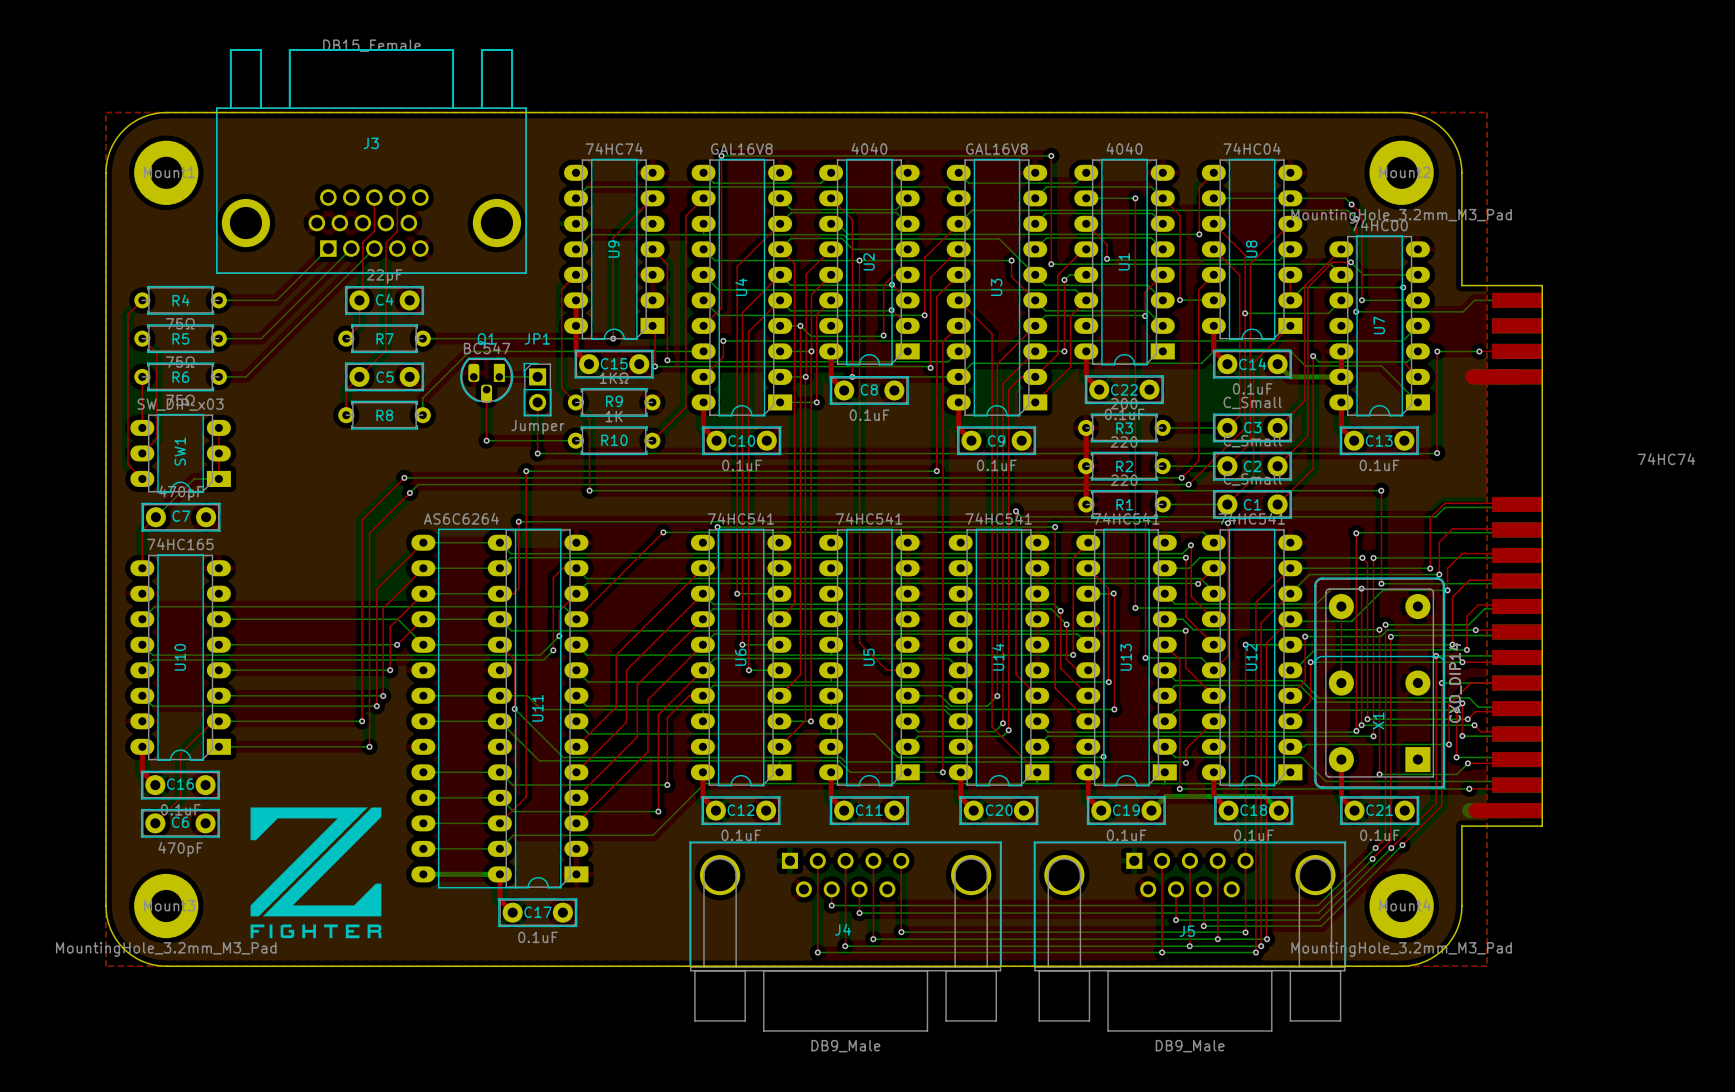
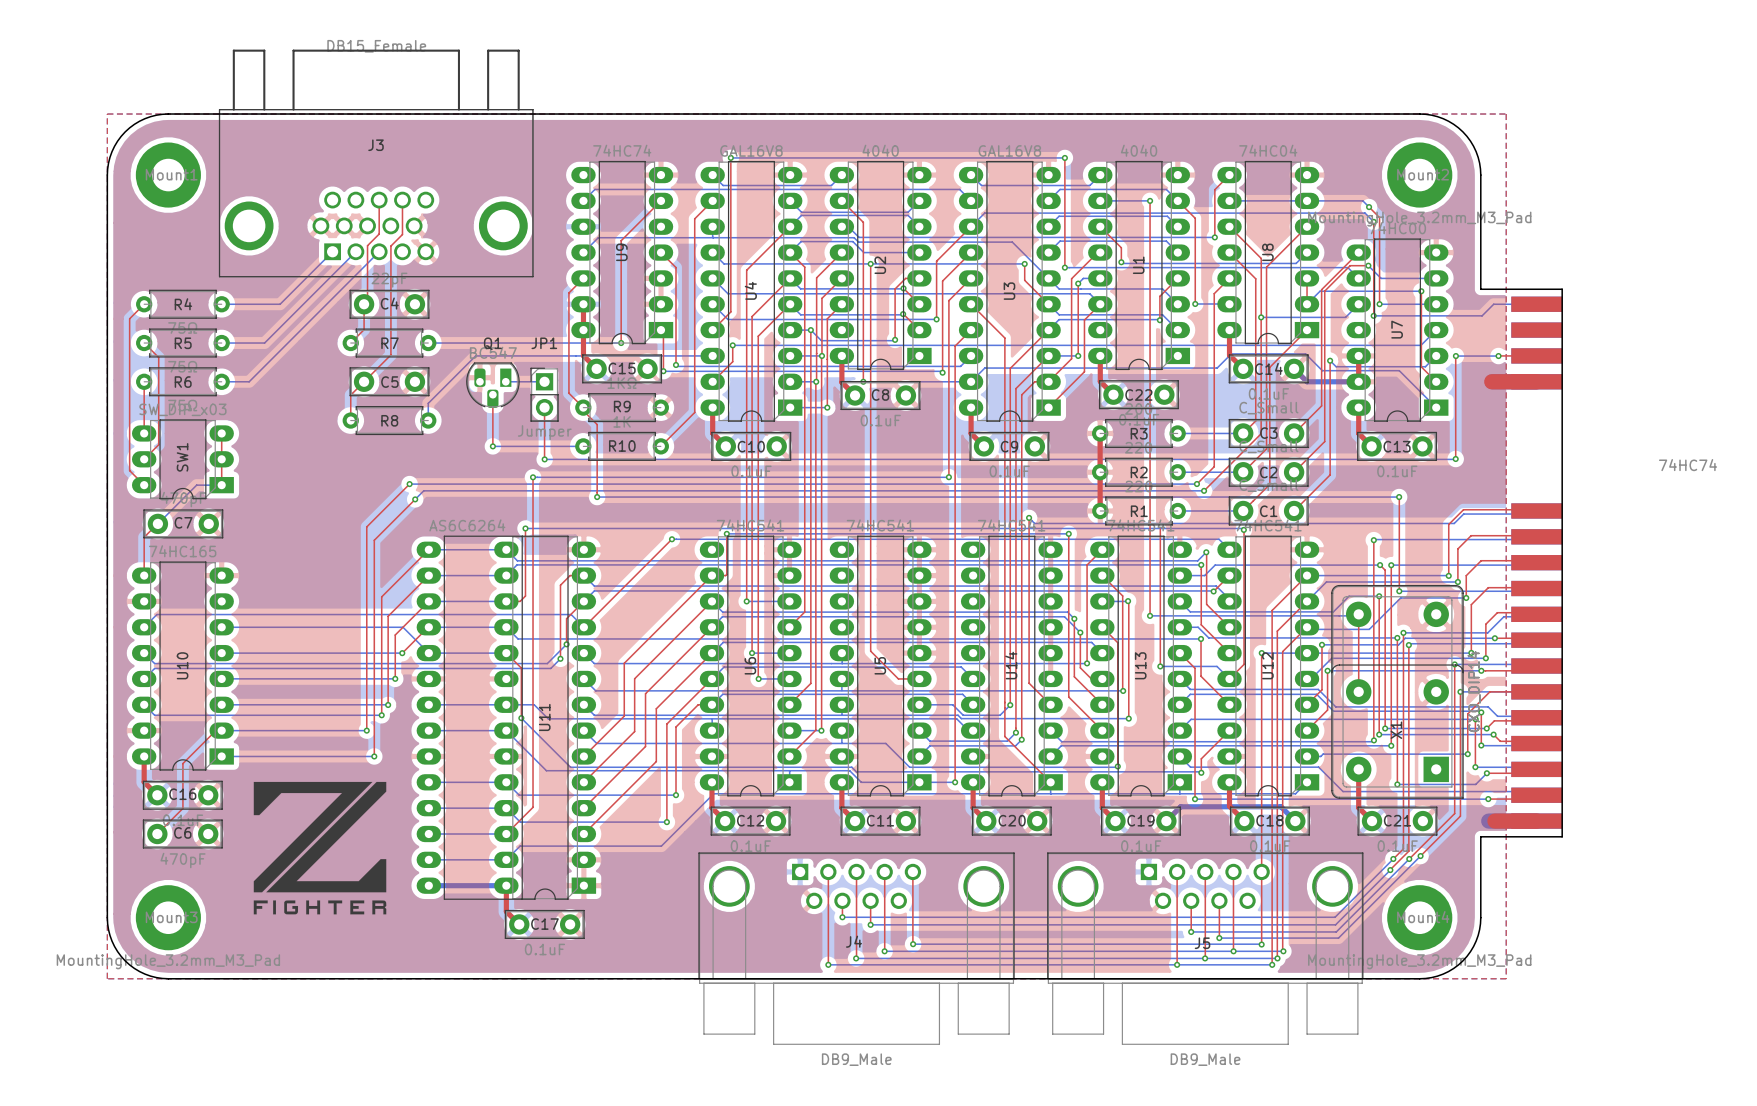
drawing position: (315, 872) -> (320, 848)

